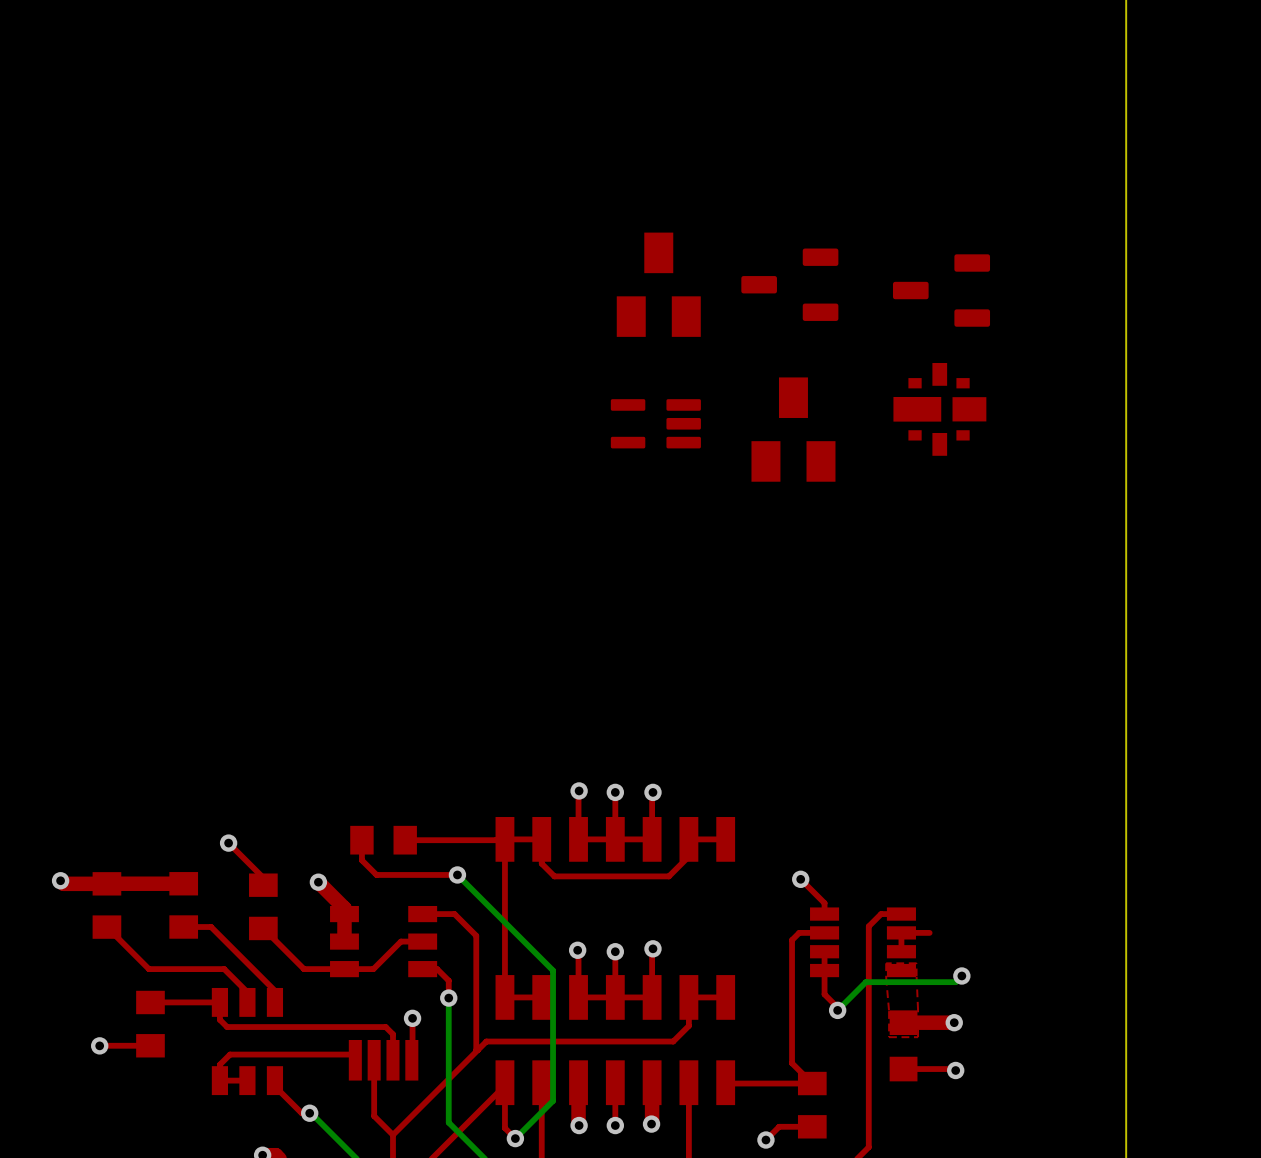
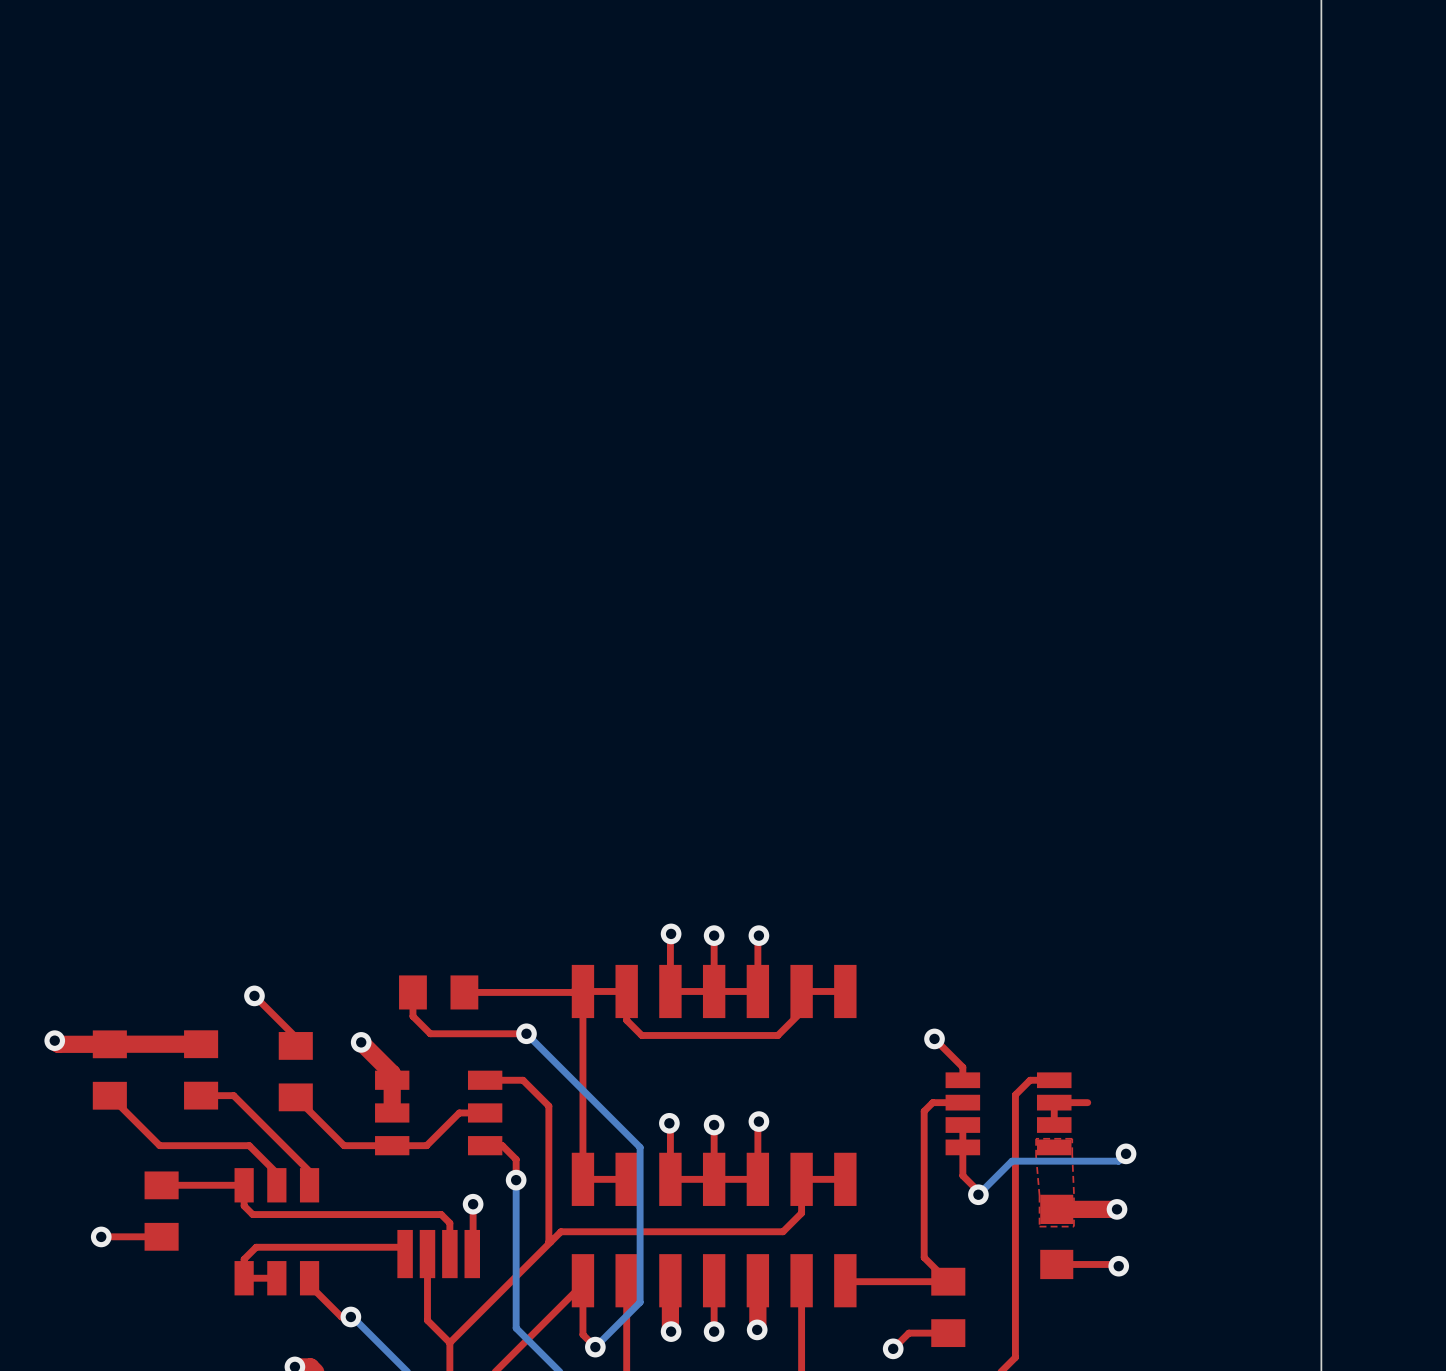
part: (658, 284) -> none
part: (789, 284) -> none
part: (941, 290) -> none
part: (939, 409) -> none
part: (655, 423) -> none
part: (793, 429) -> none

